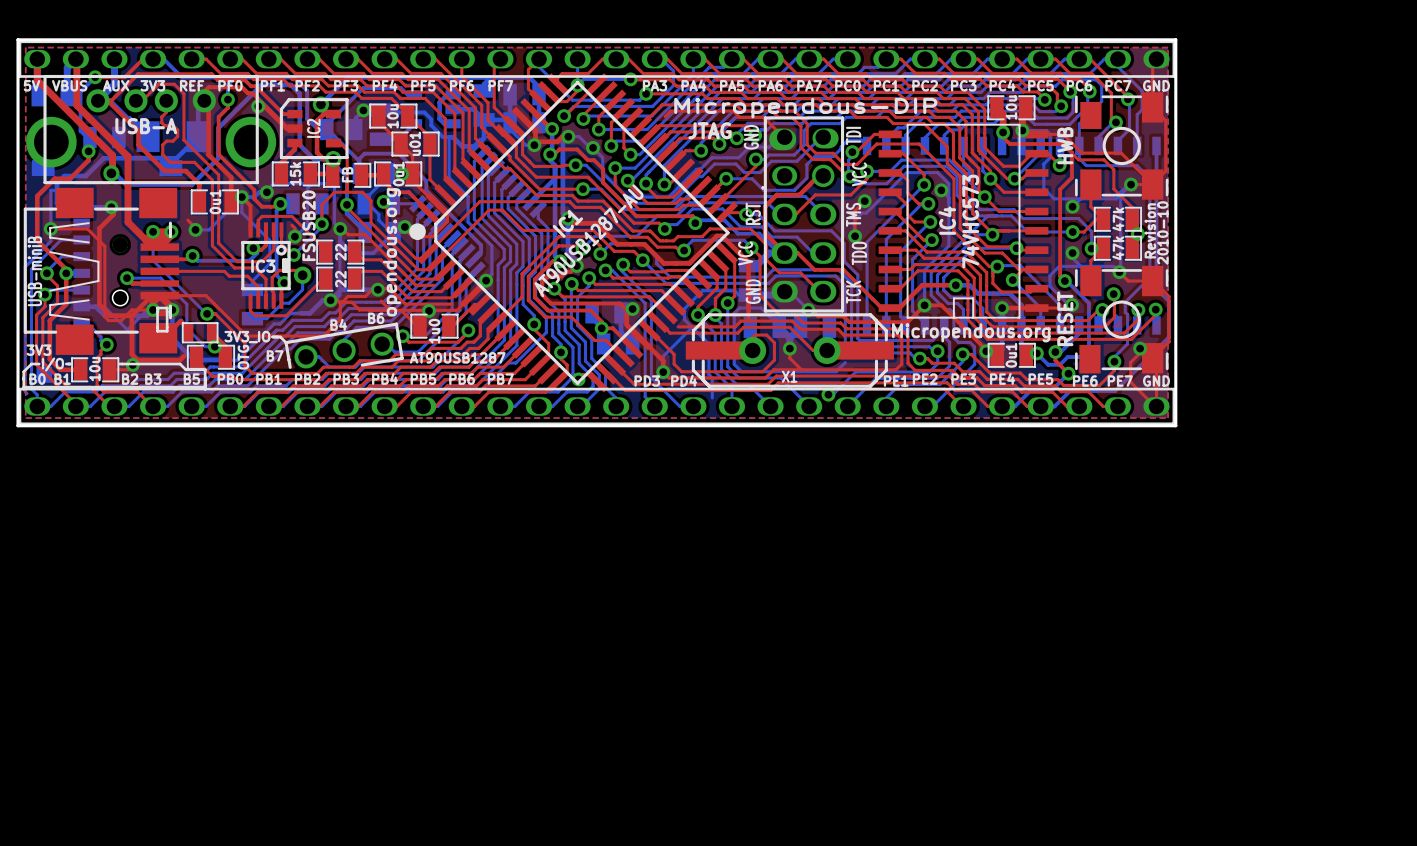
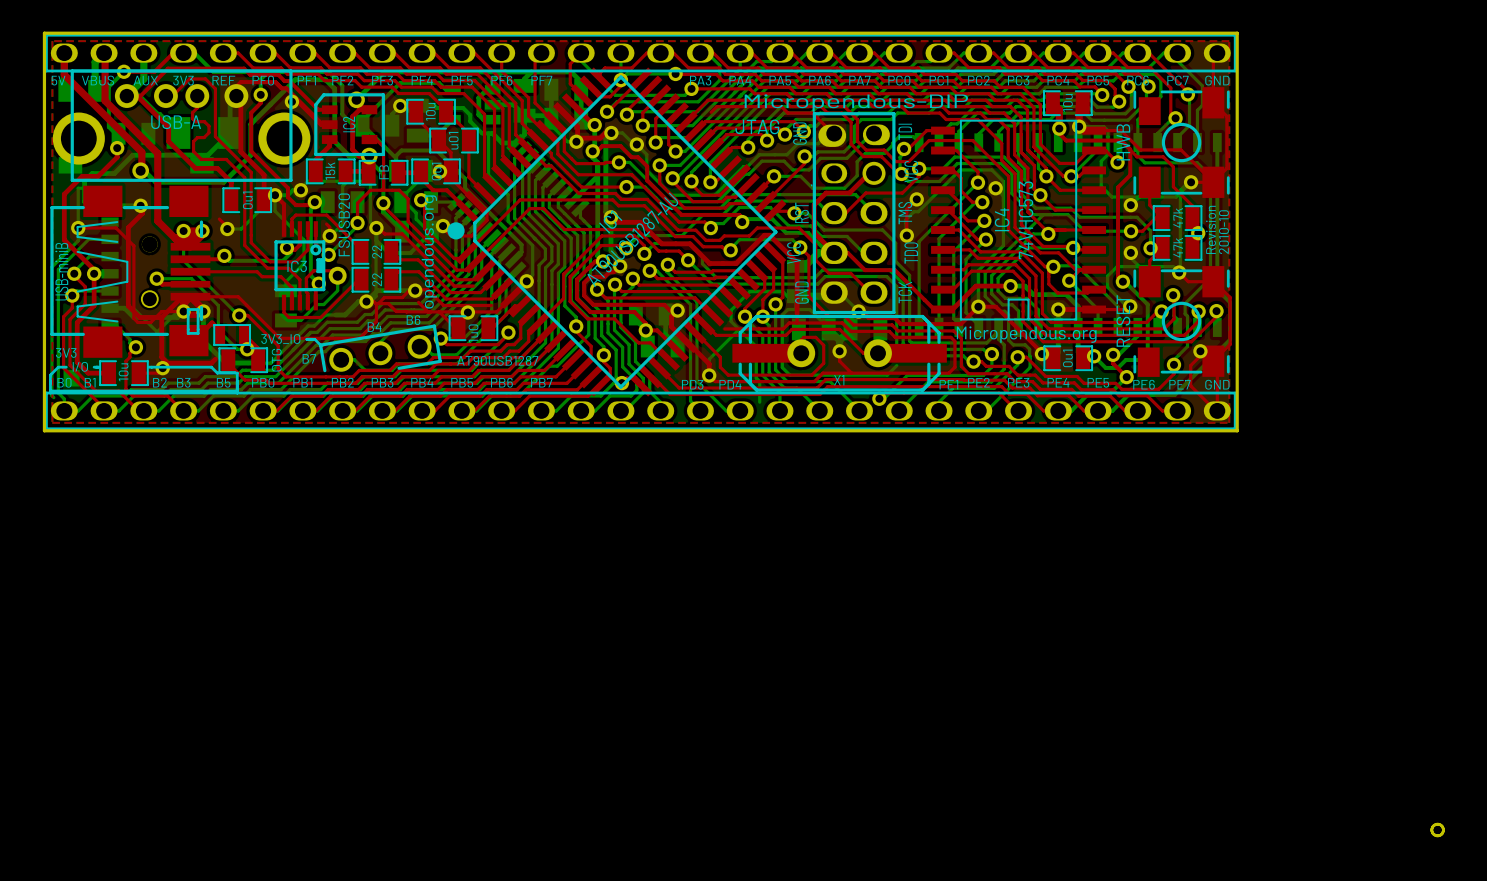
part: none -> (1437, 830)

